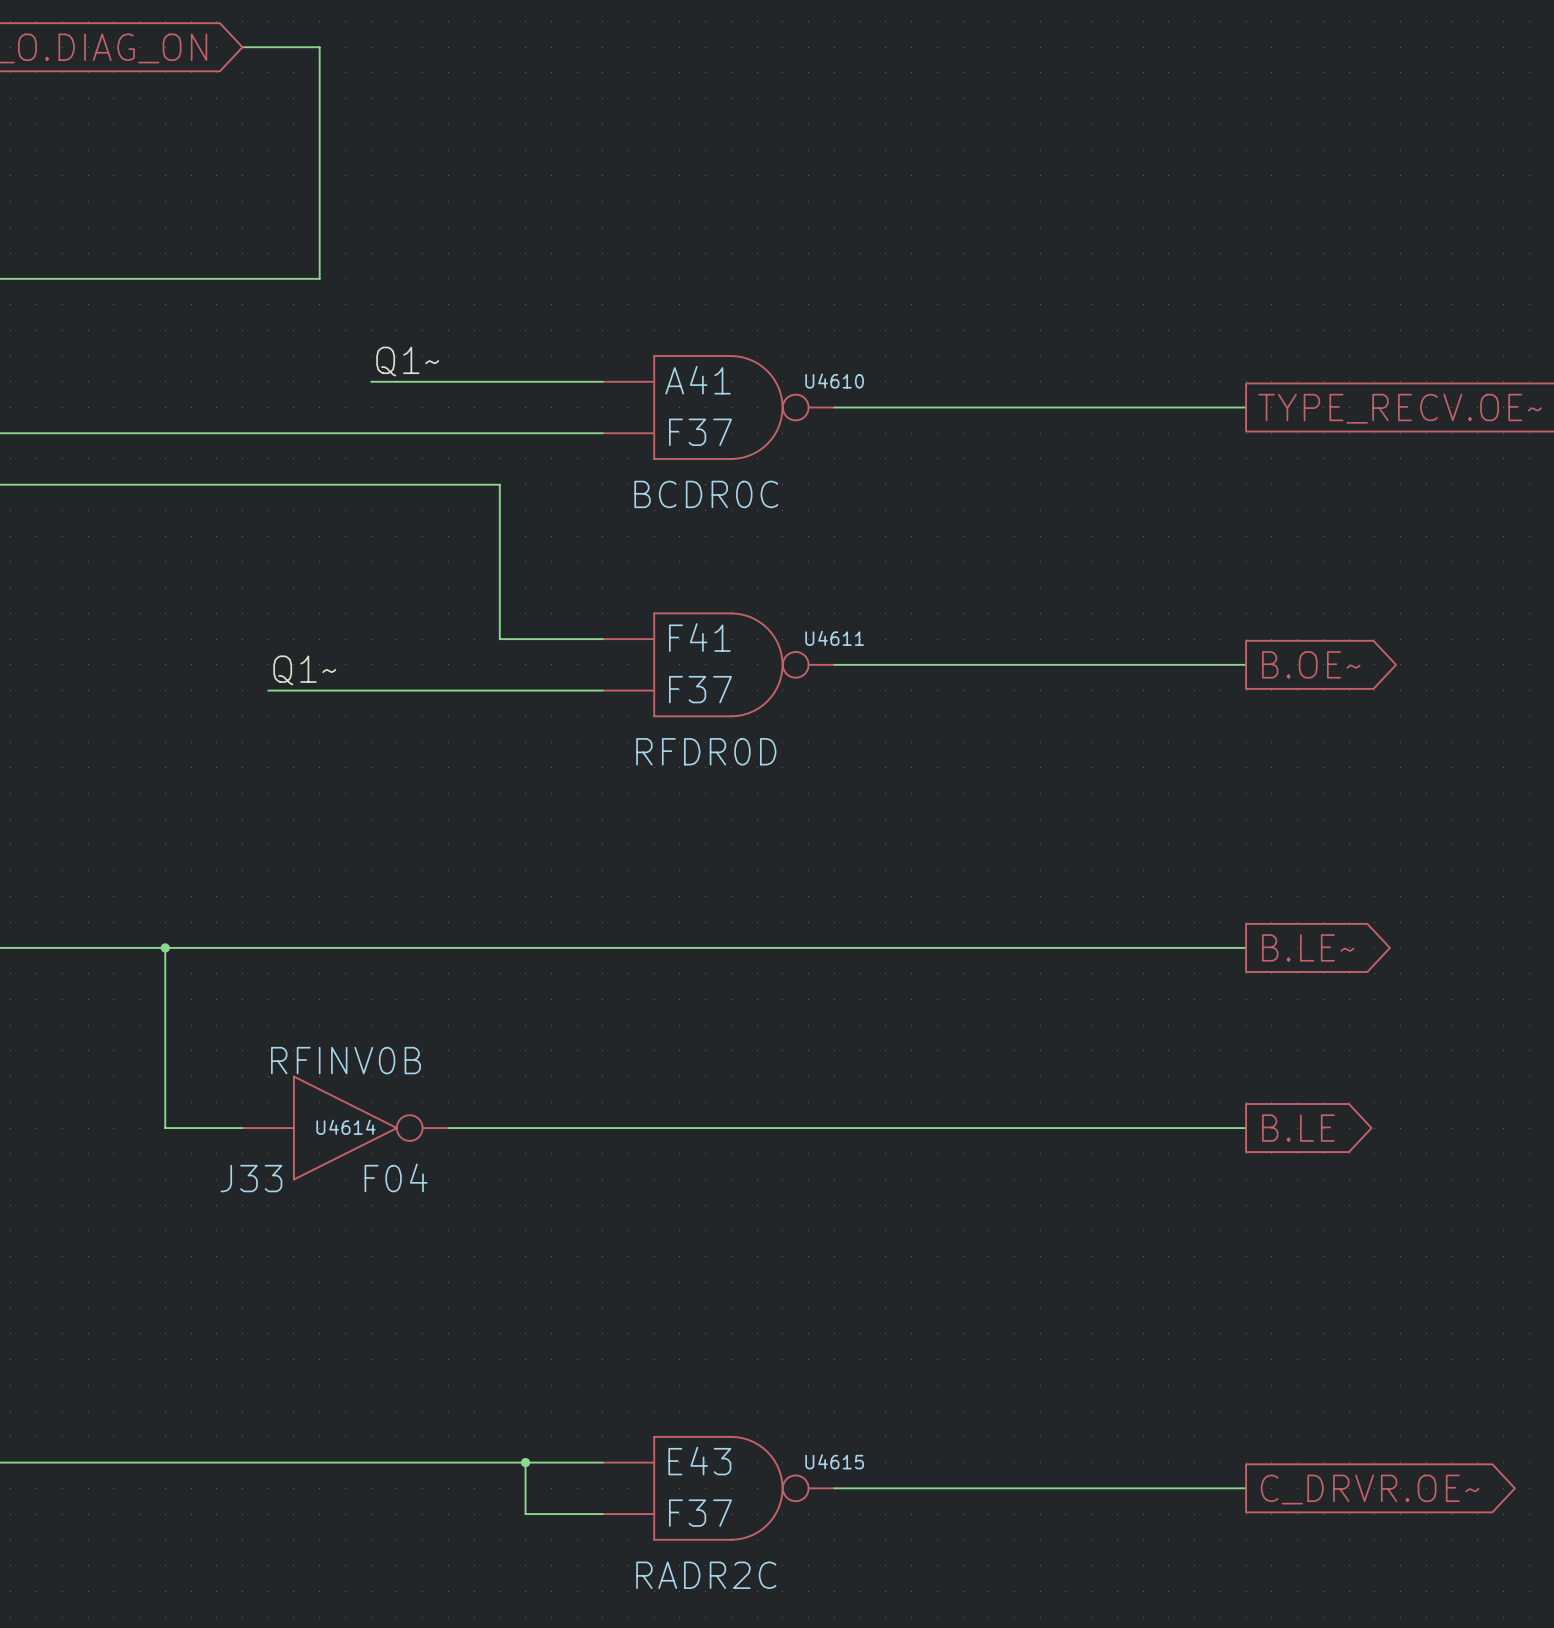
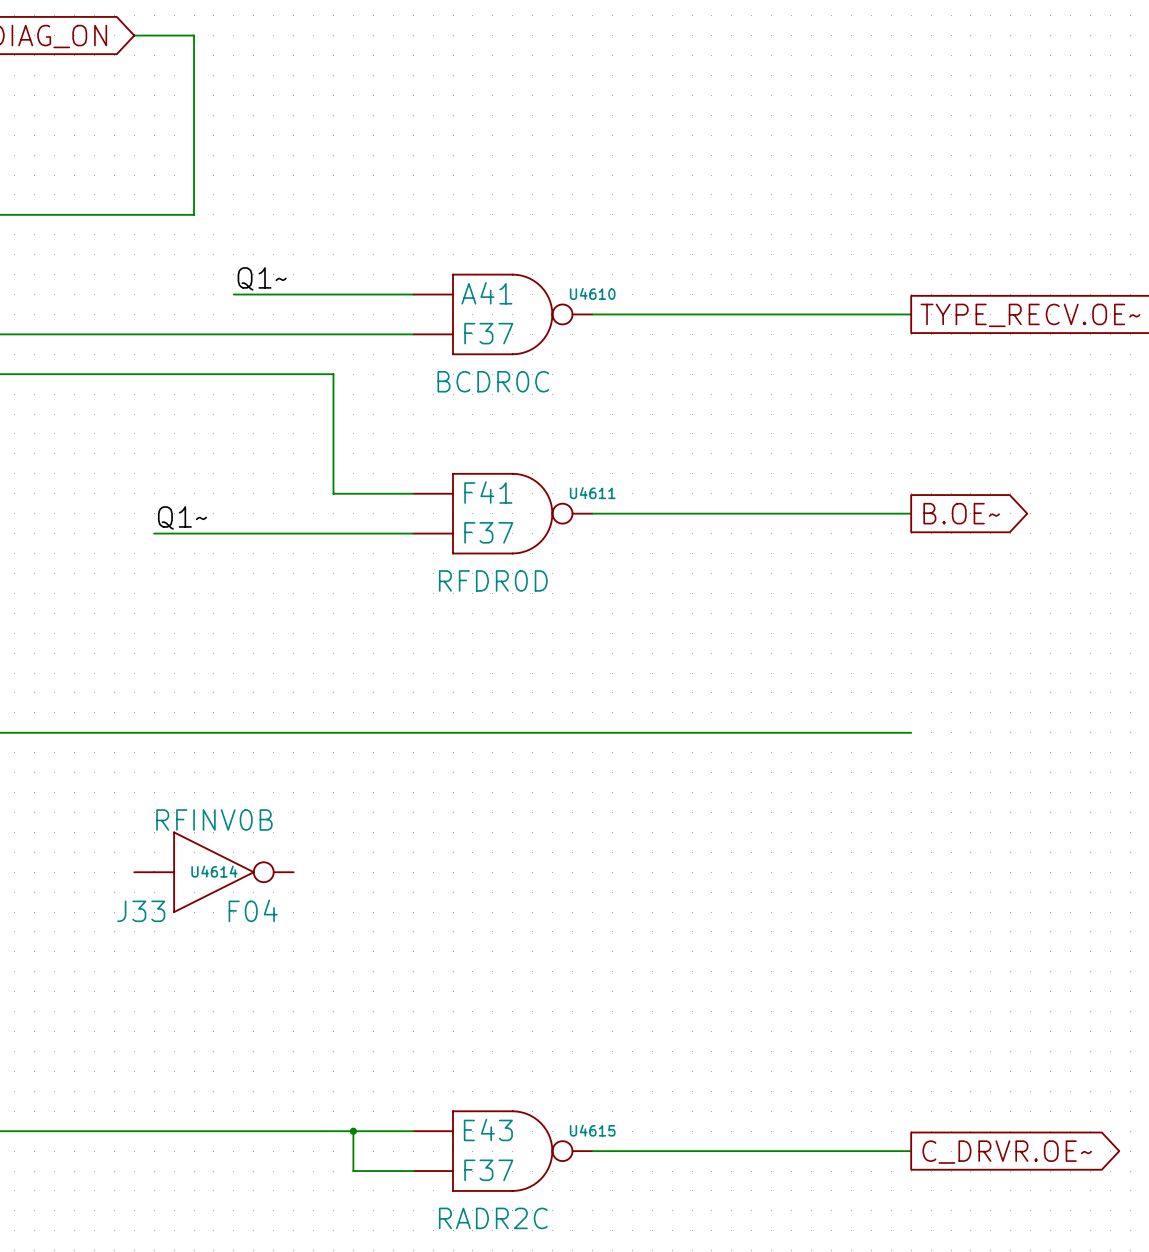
wire: (165, 947) (165, 1128) (242, 1128) -> none
junction: (165, 947) -> none
global label: B.LE~ (1308, 947) -> none
wire: (448, 1128) (1246, 1128) -> none
global label: B.LE (1298, 1128) -> none

